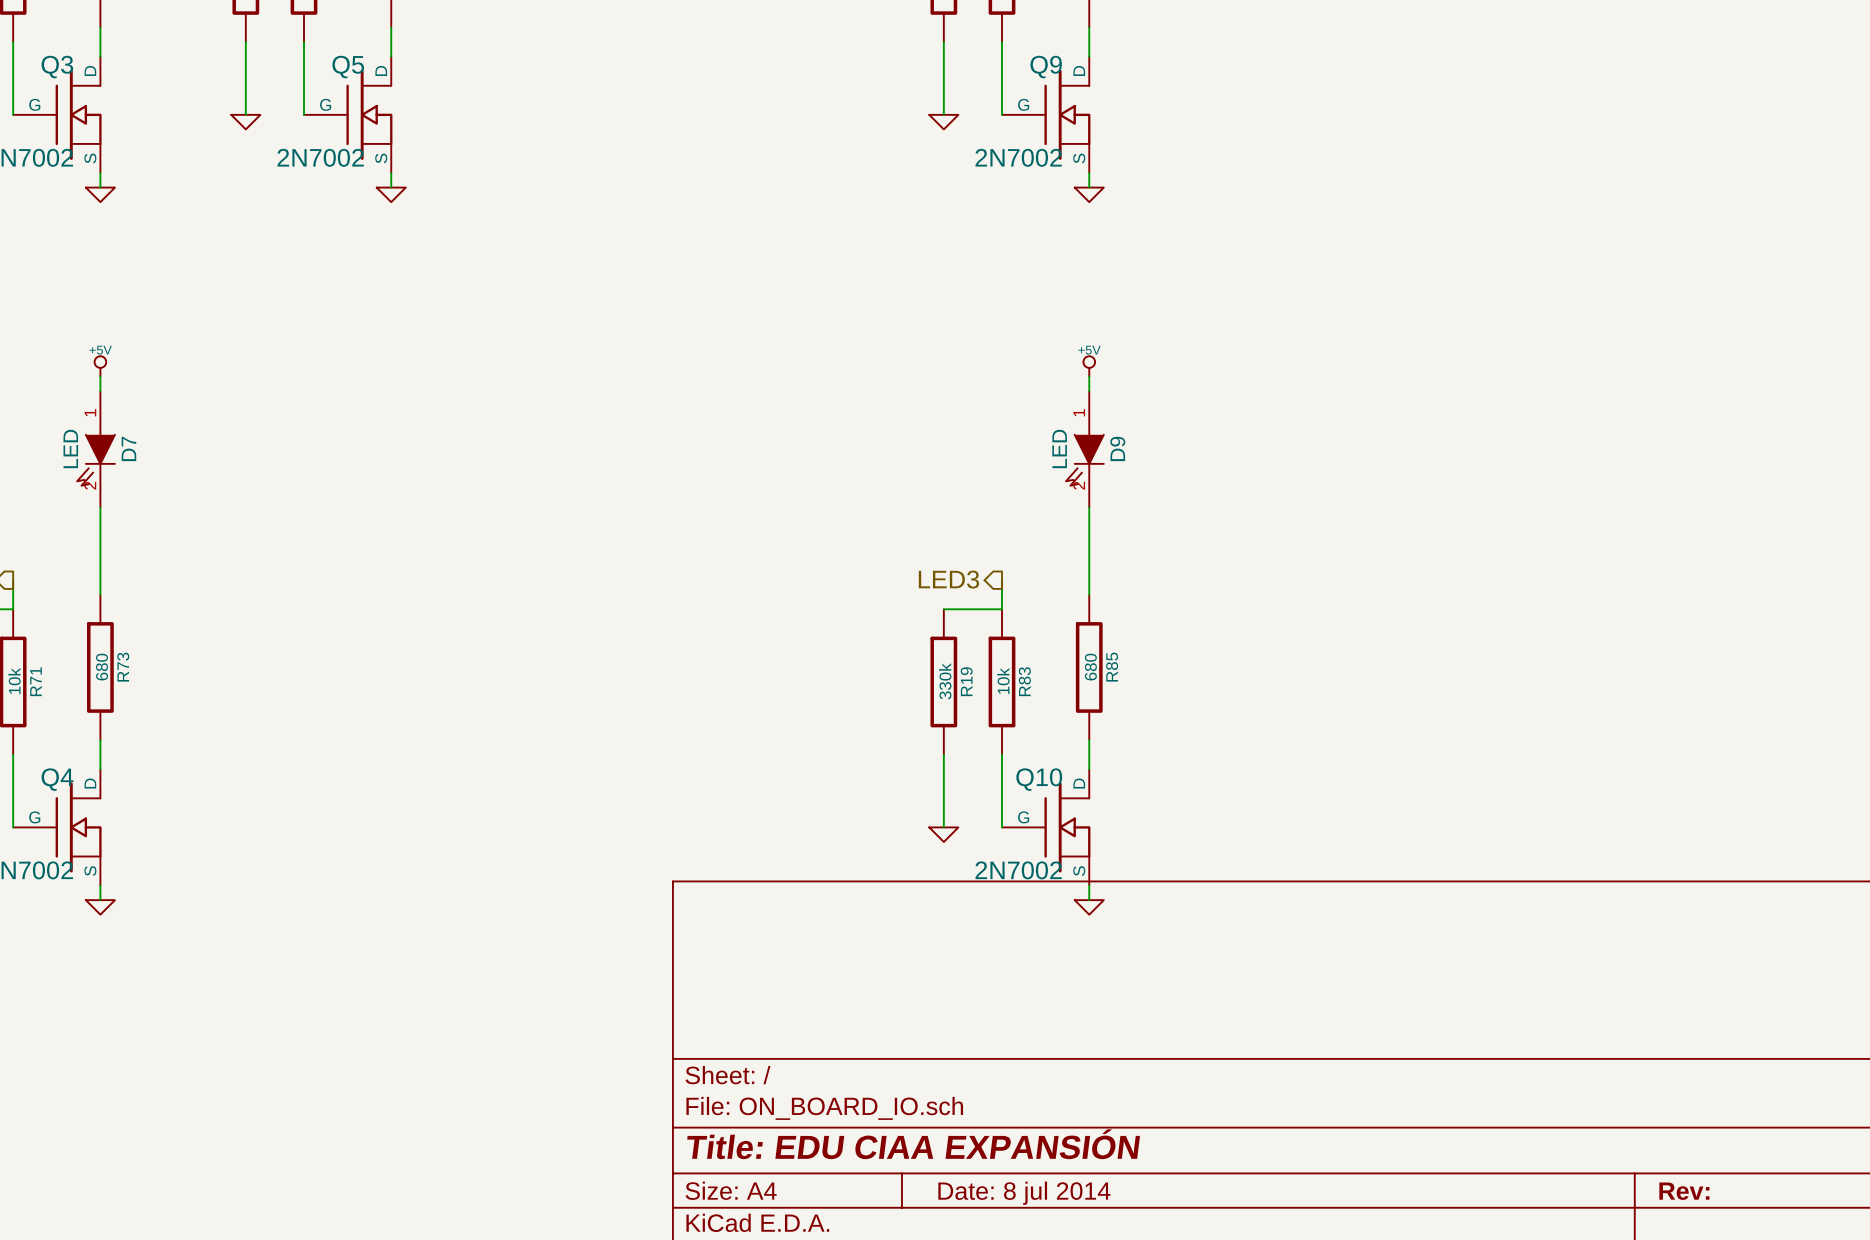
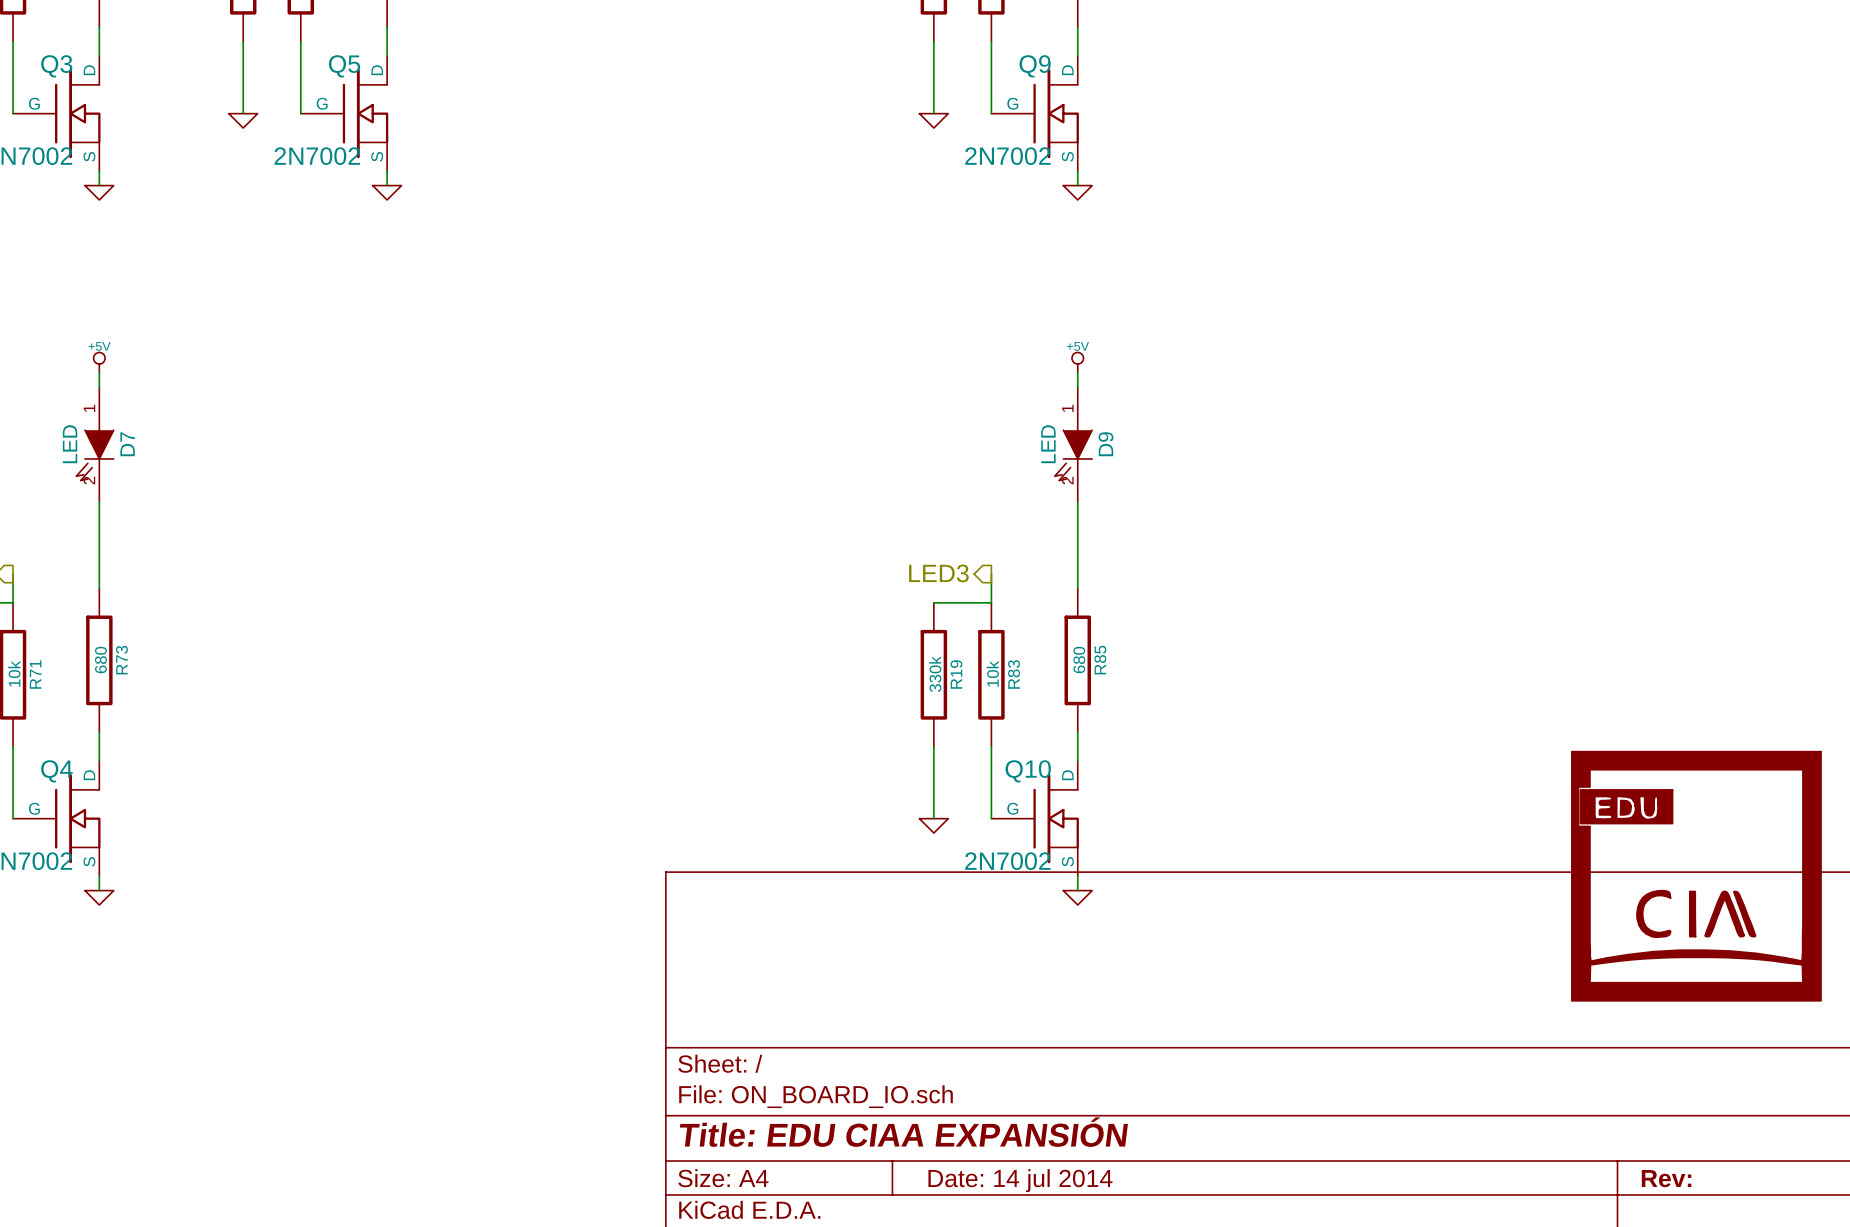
power symbol: none -> (1696, 876)
title block: Date: 8 jul 2014 (1024, 1193) -> Date: 14 jul 2014 (1020, 1180)

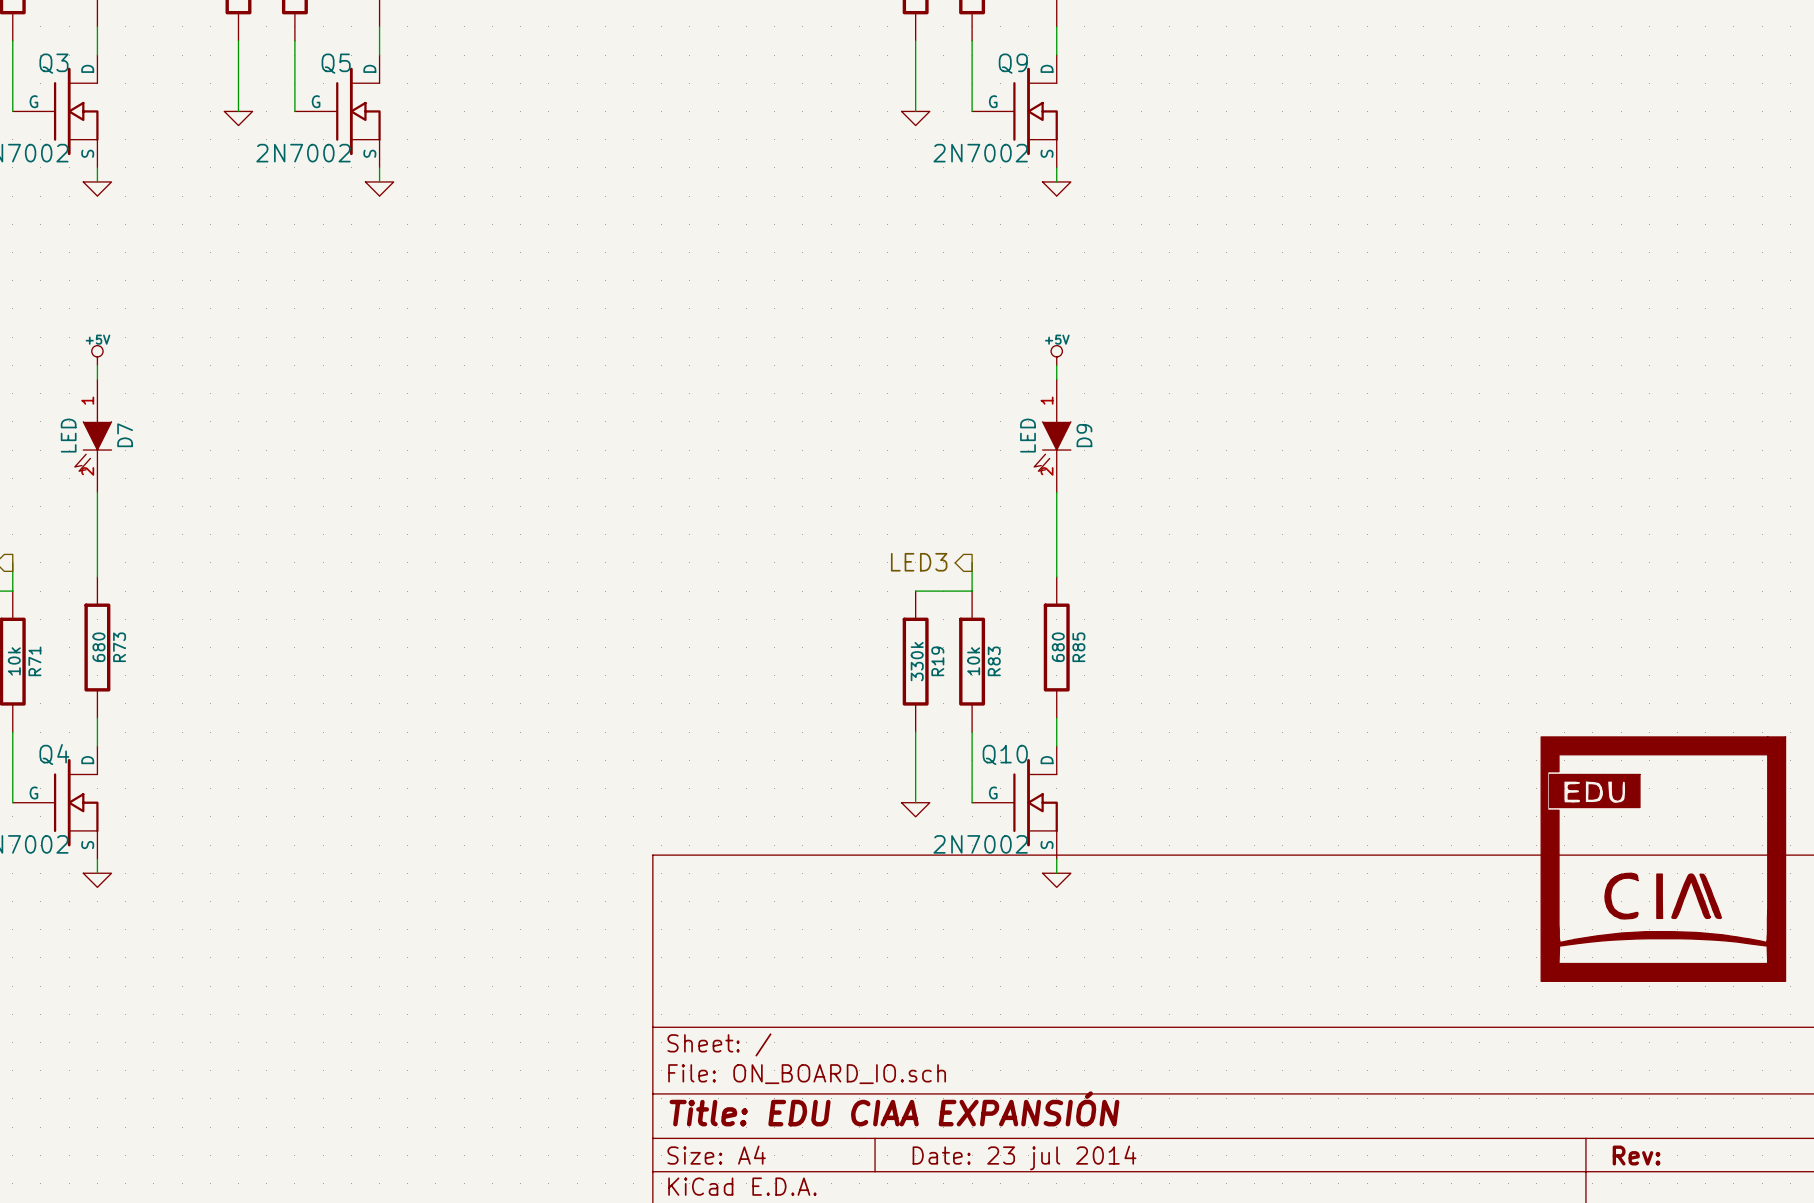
title block: Date: 14 jul 2014 (1020, 1180) -> Date: 23 jul 2014 (1024, 1157)

